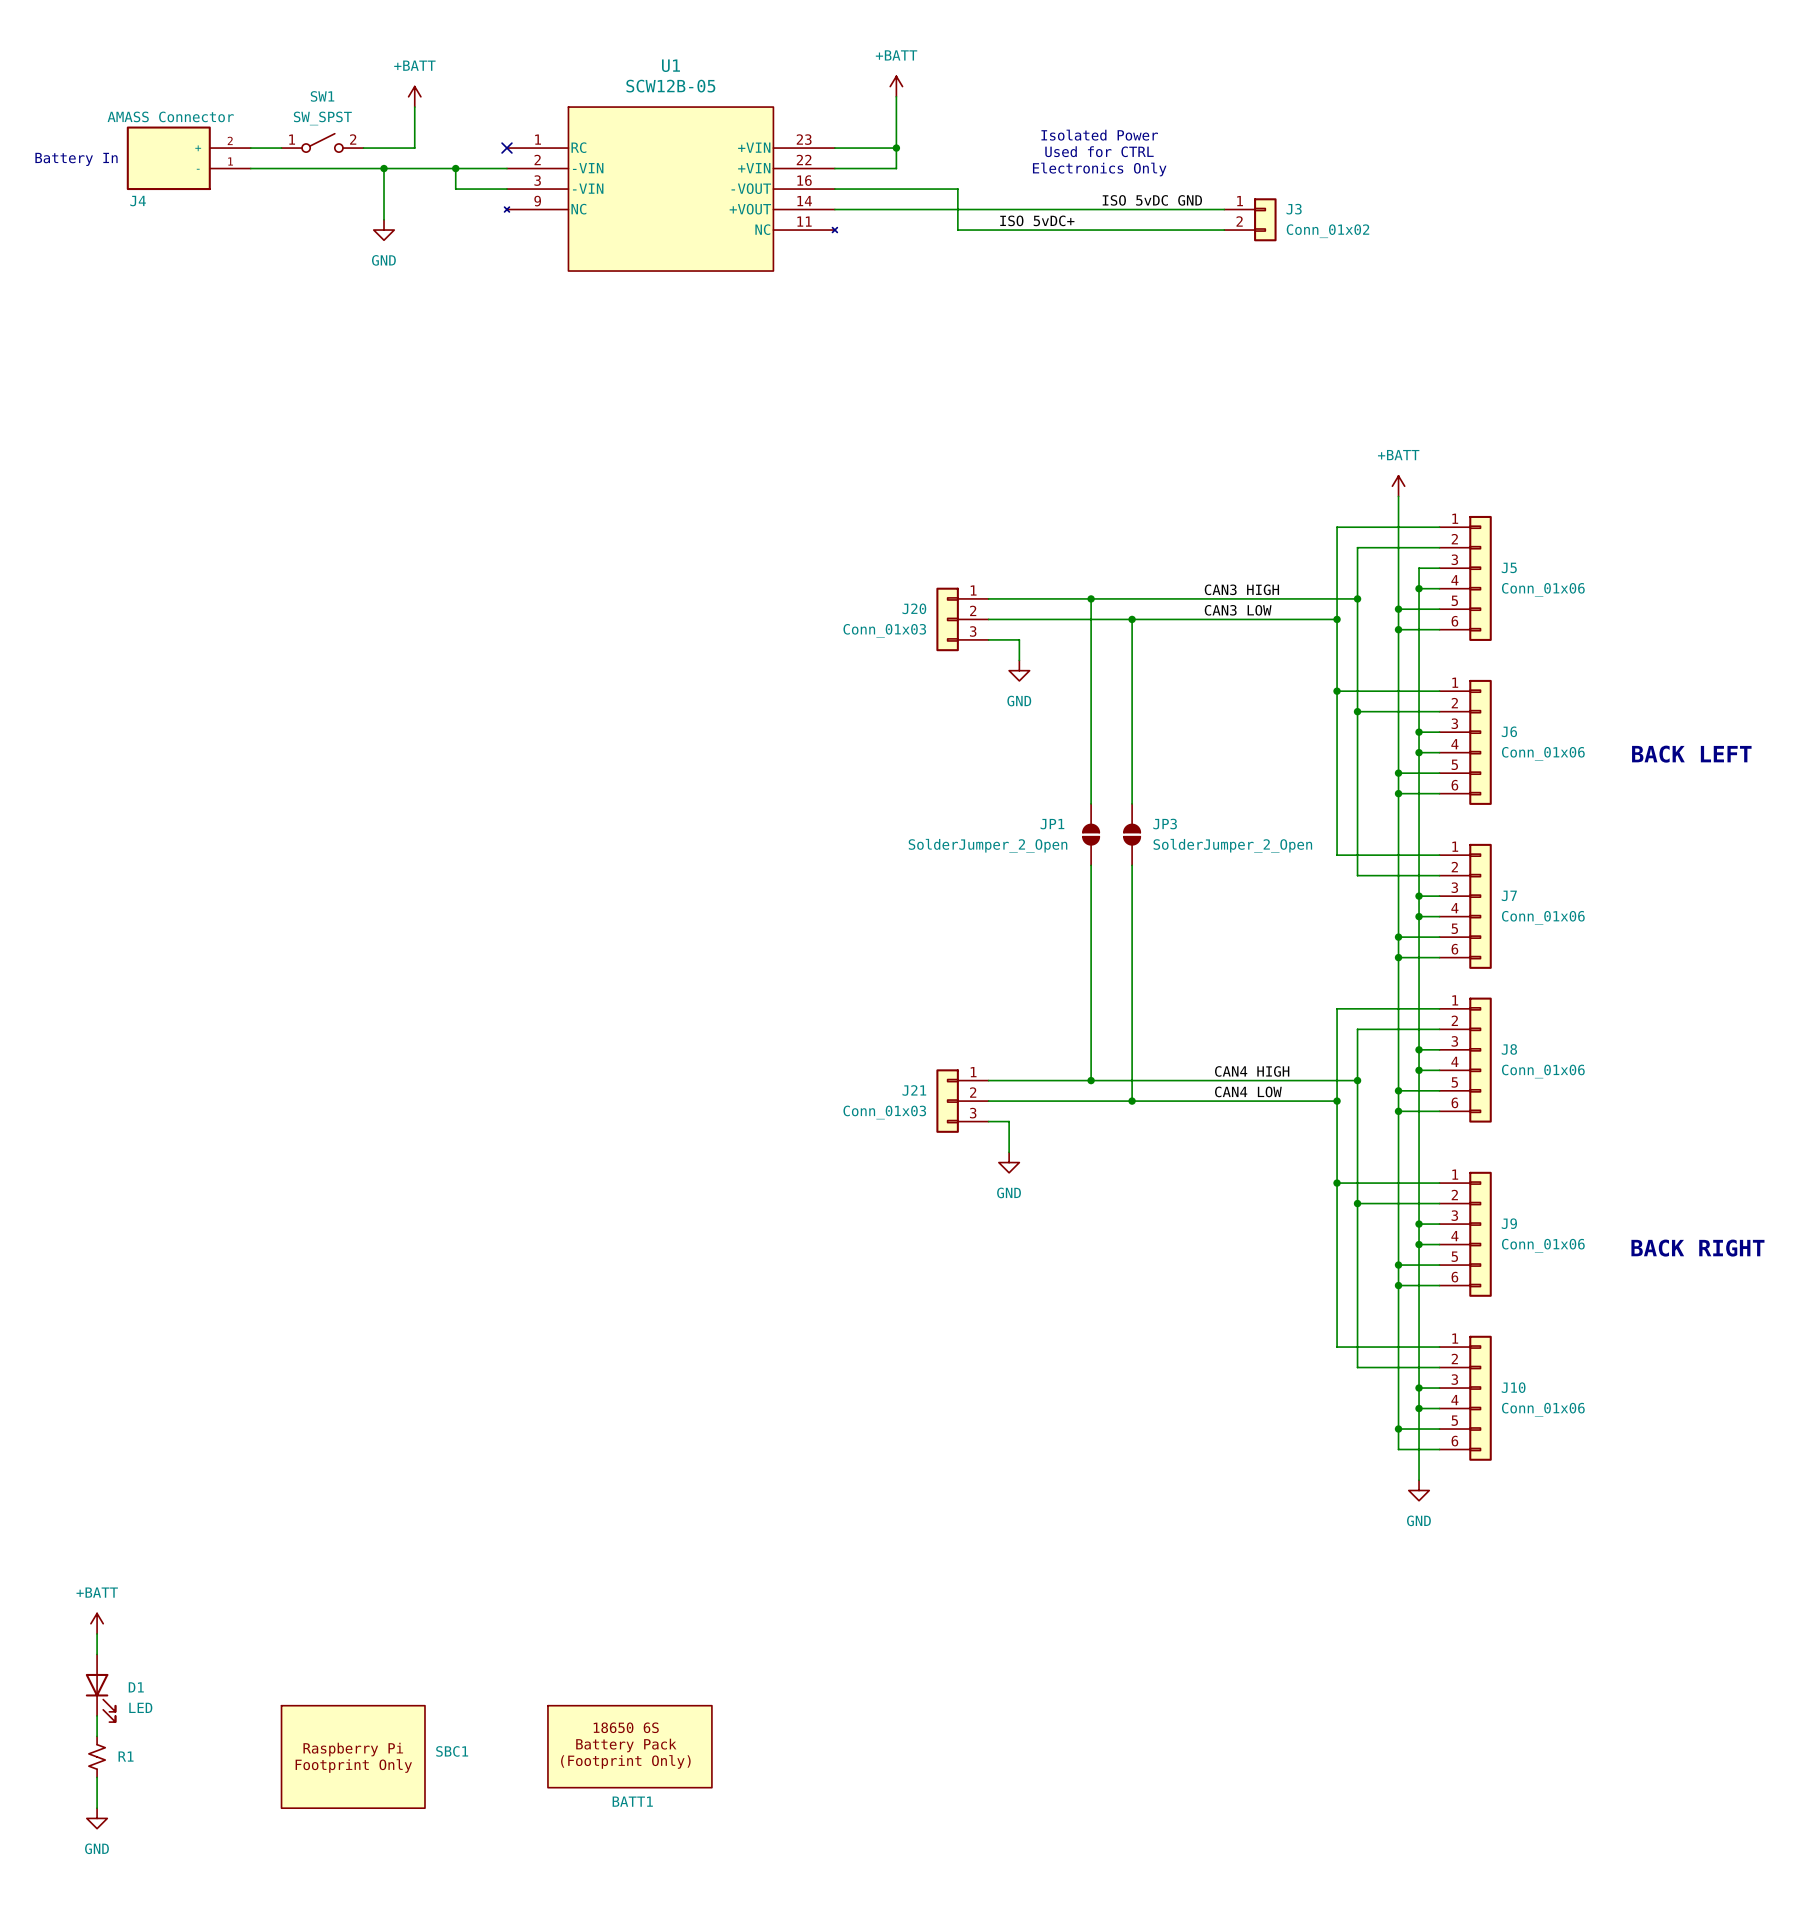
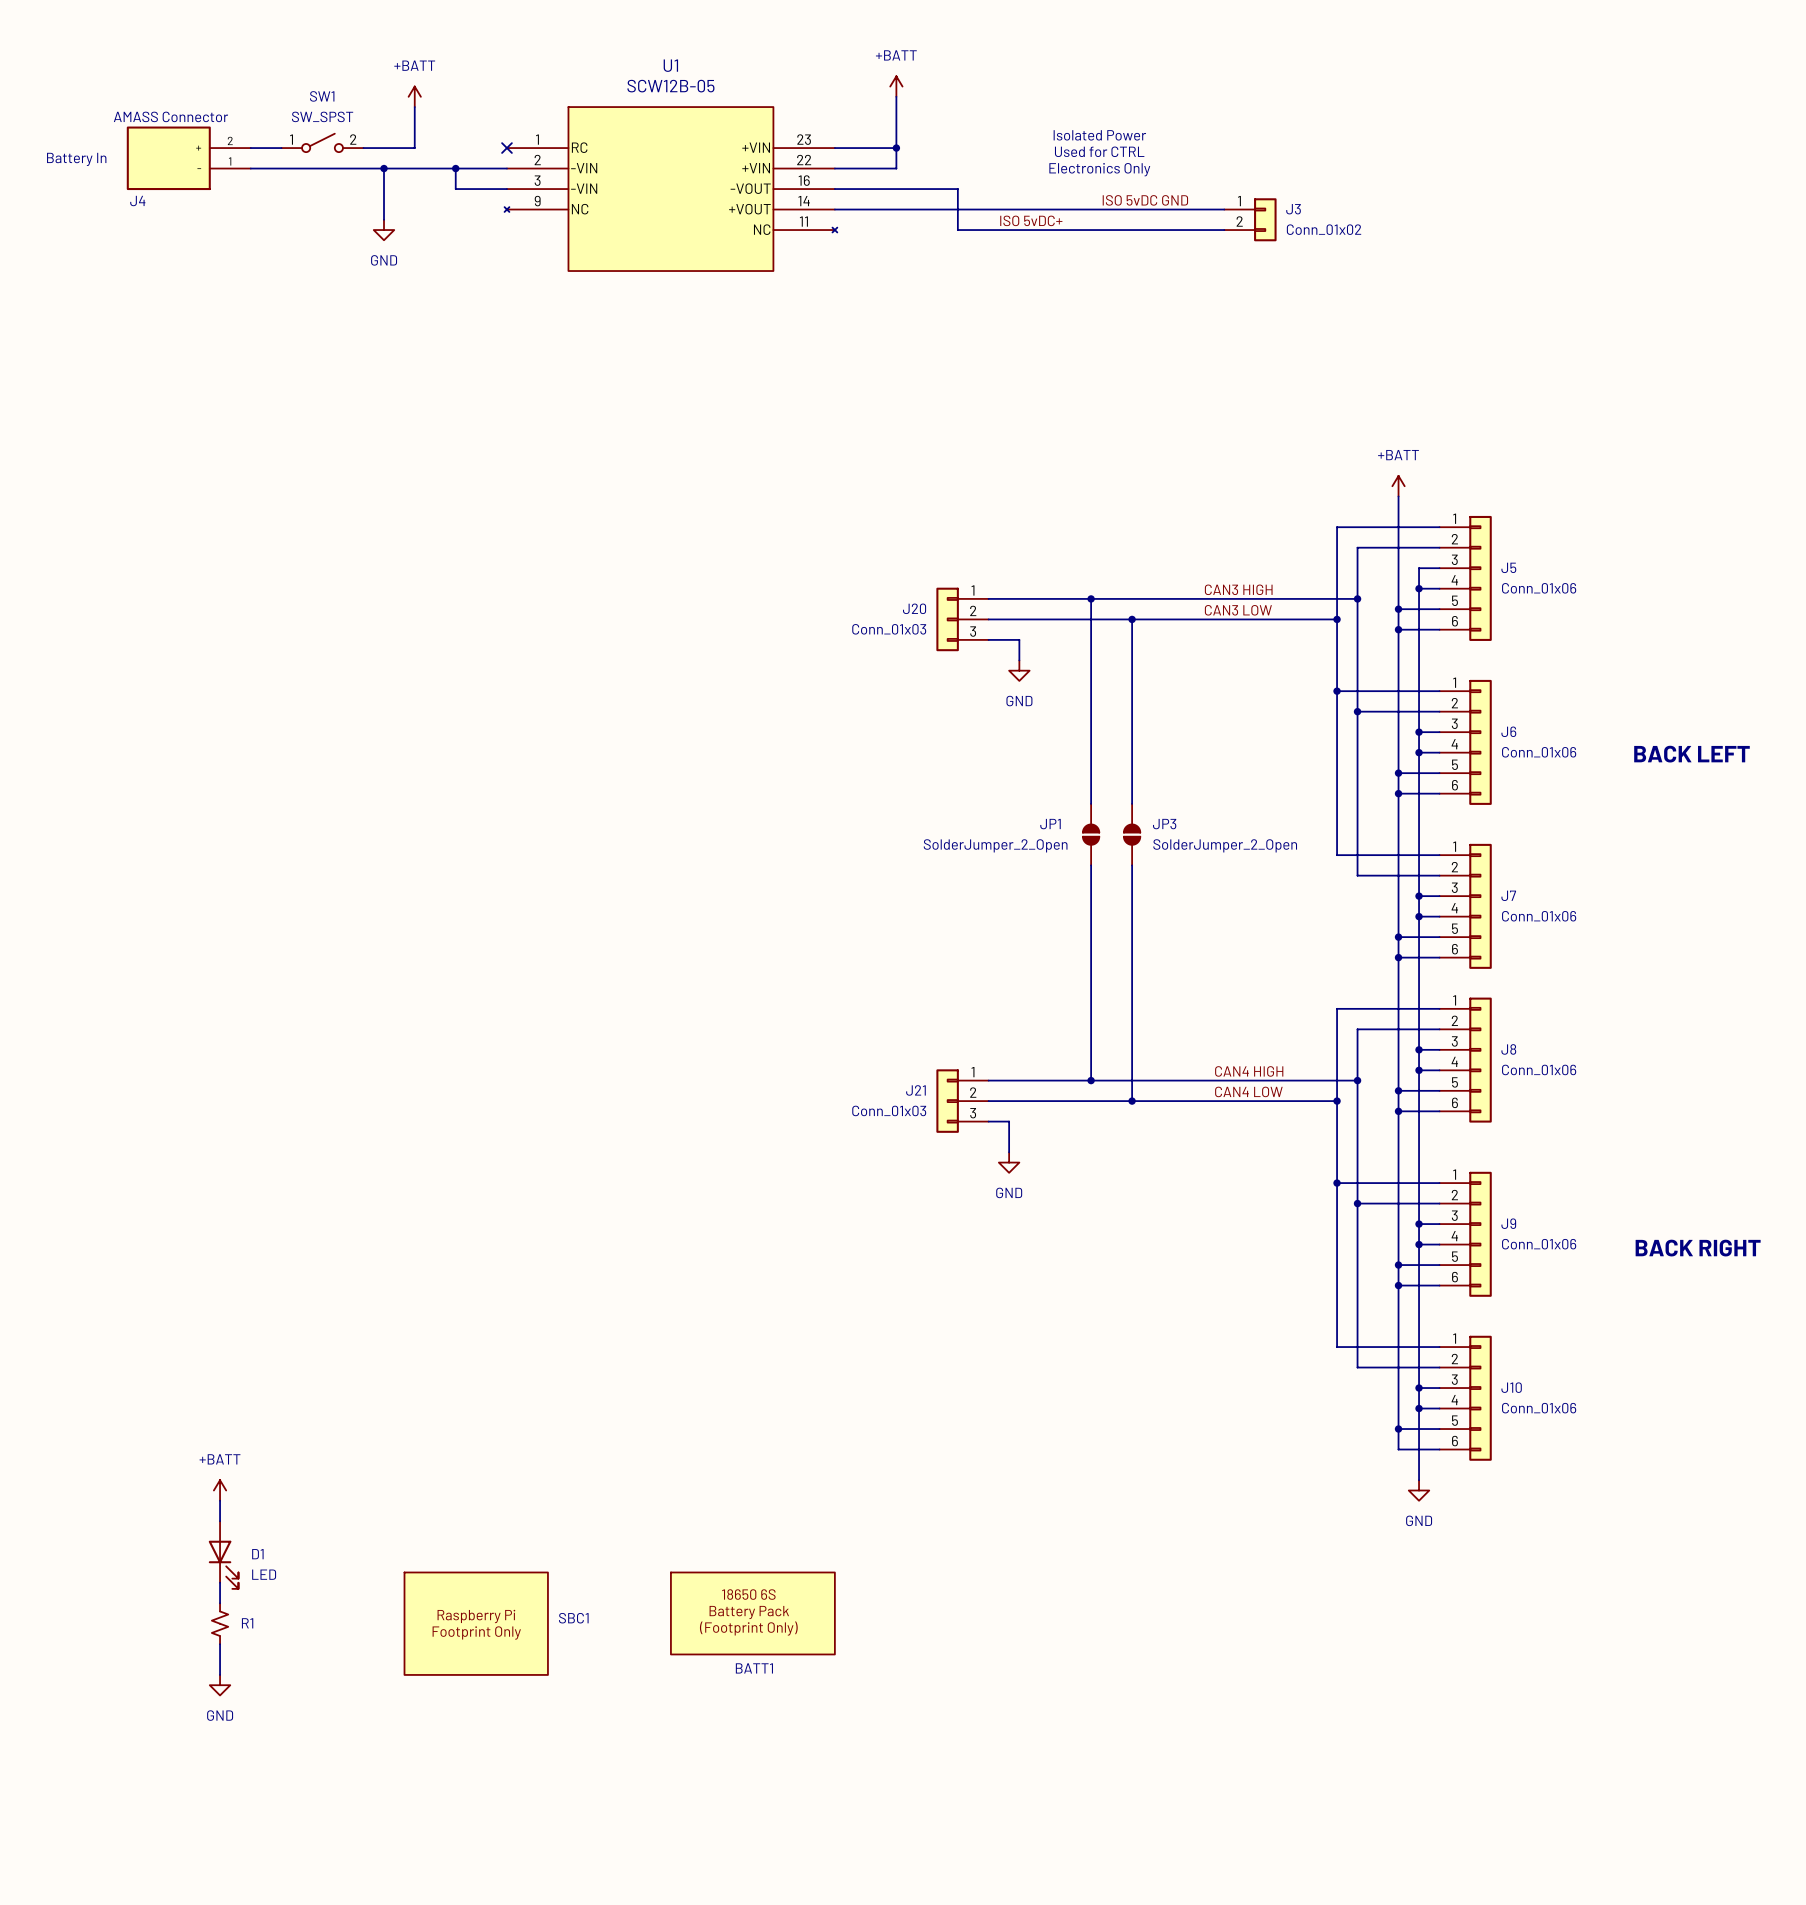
power symbol position: +BATT (97, 1623) -> +BATT (220, 1490)
wire: (97, 1633) (97, 1654) -> (220, 1500) (220, 1521)
D1 position: (100, 1688) -> (223, 1555)
wire: (97, 1715) (97, 1736) -> (220, 1582) (220, 1603)
BATT1 position: (629, 1746) -> (752, 1613)
R1 position: (97, 1756) -> (220, 1623)
SBC1 position: (353, 1756) -> (476, 1623)
wire: (97, 1777) (97, 1808) -> (220, 1644) (220, 1674)
power symbol position: GND (97, 1818) -> GND (220, 1685)

